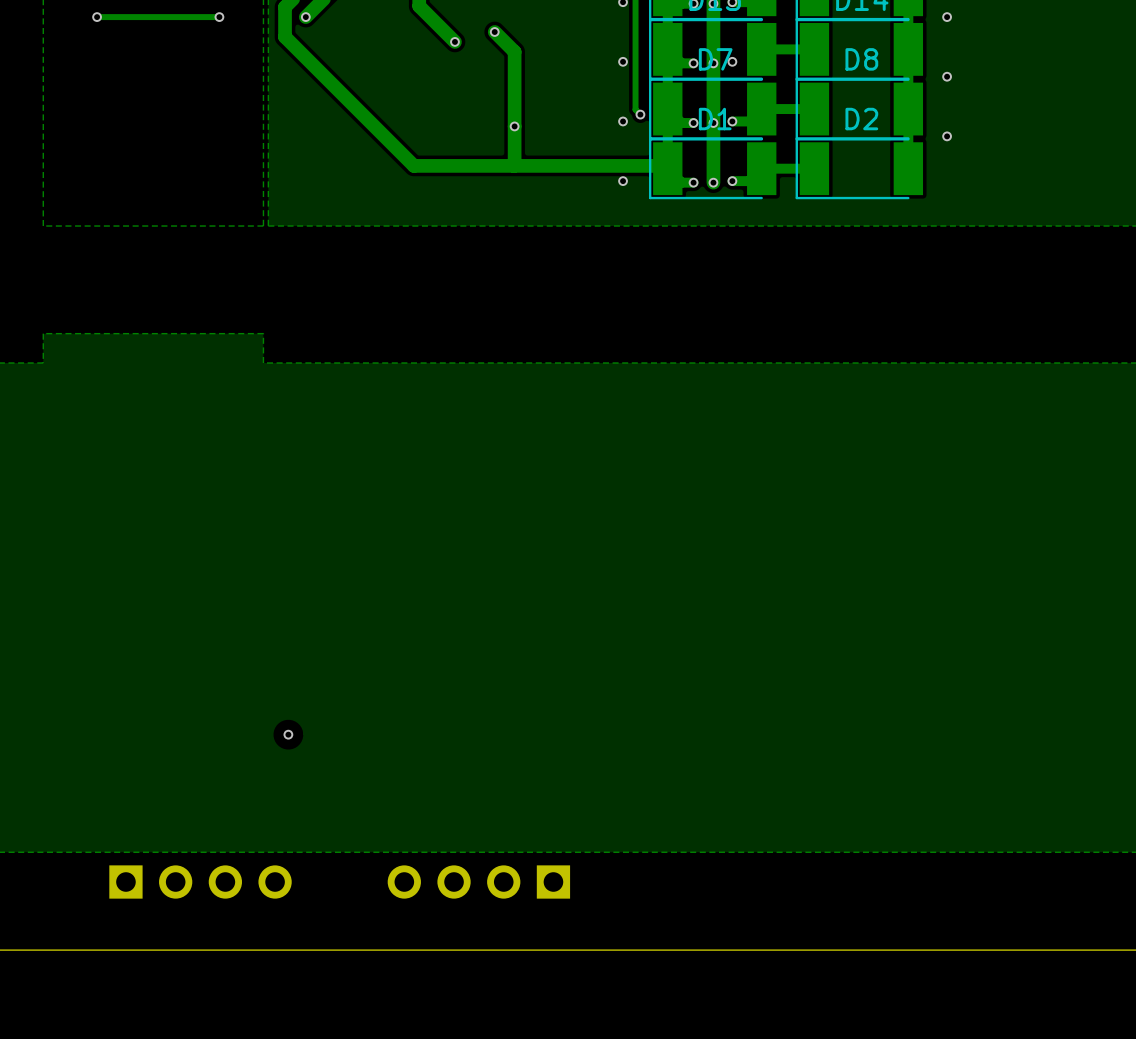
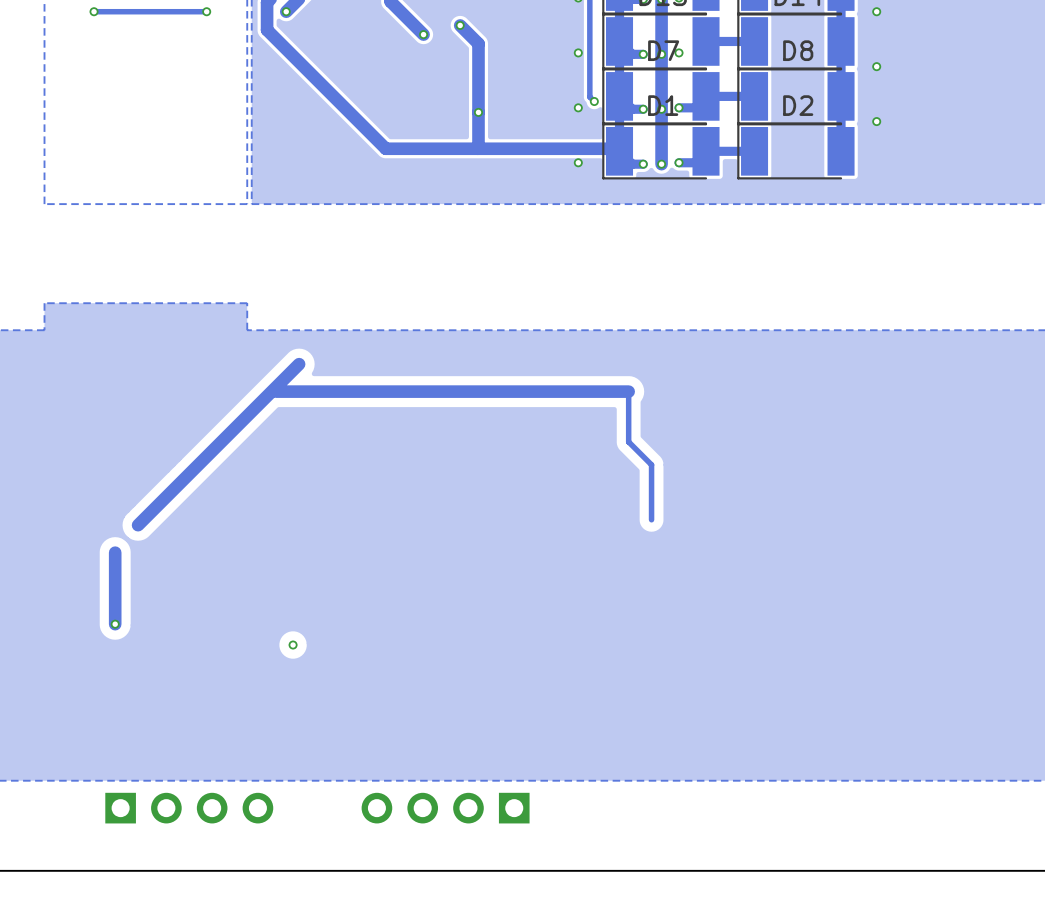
track: none -> (299, 364) (138, 525)
track: none -> (276, 391) (628, 391) (628, 441) (651, 464) (651, 519)
track: none -> (115, 552) (115, 624)
via: none -> (115, 624)
via position: (288, 734) -> (293, 645)

